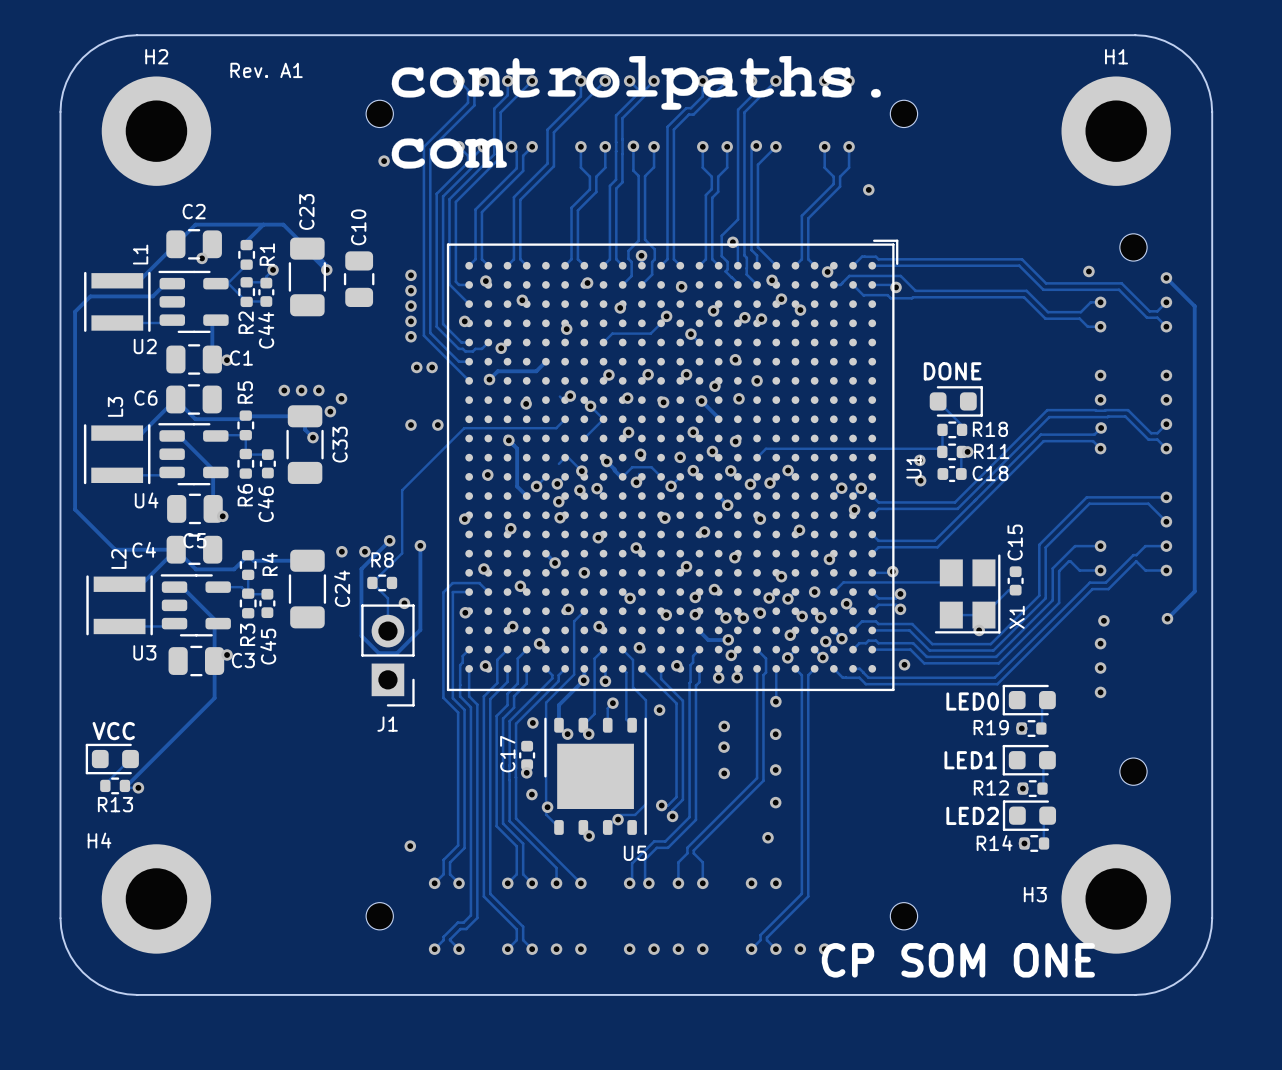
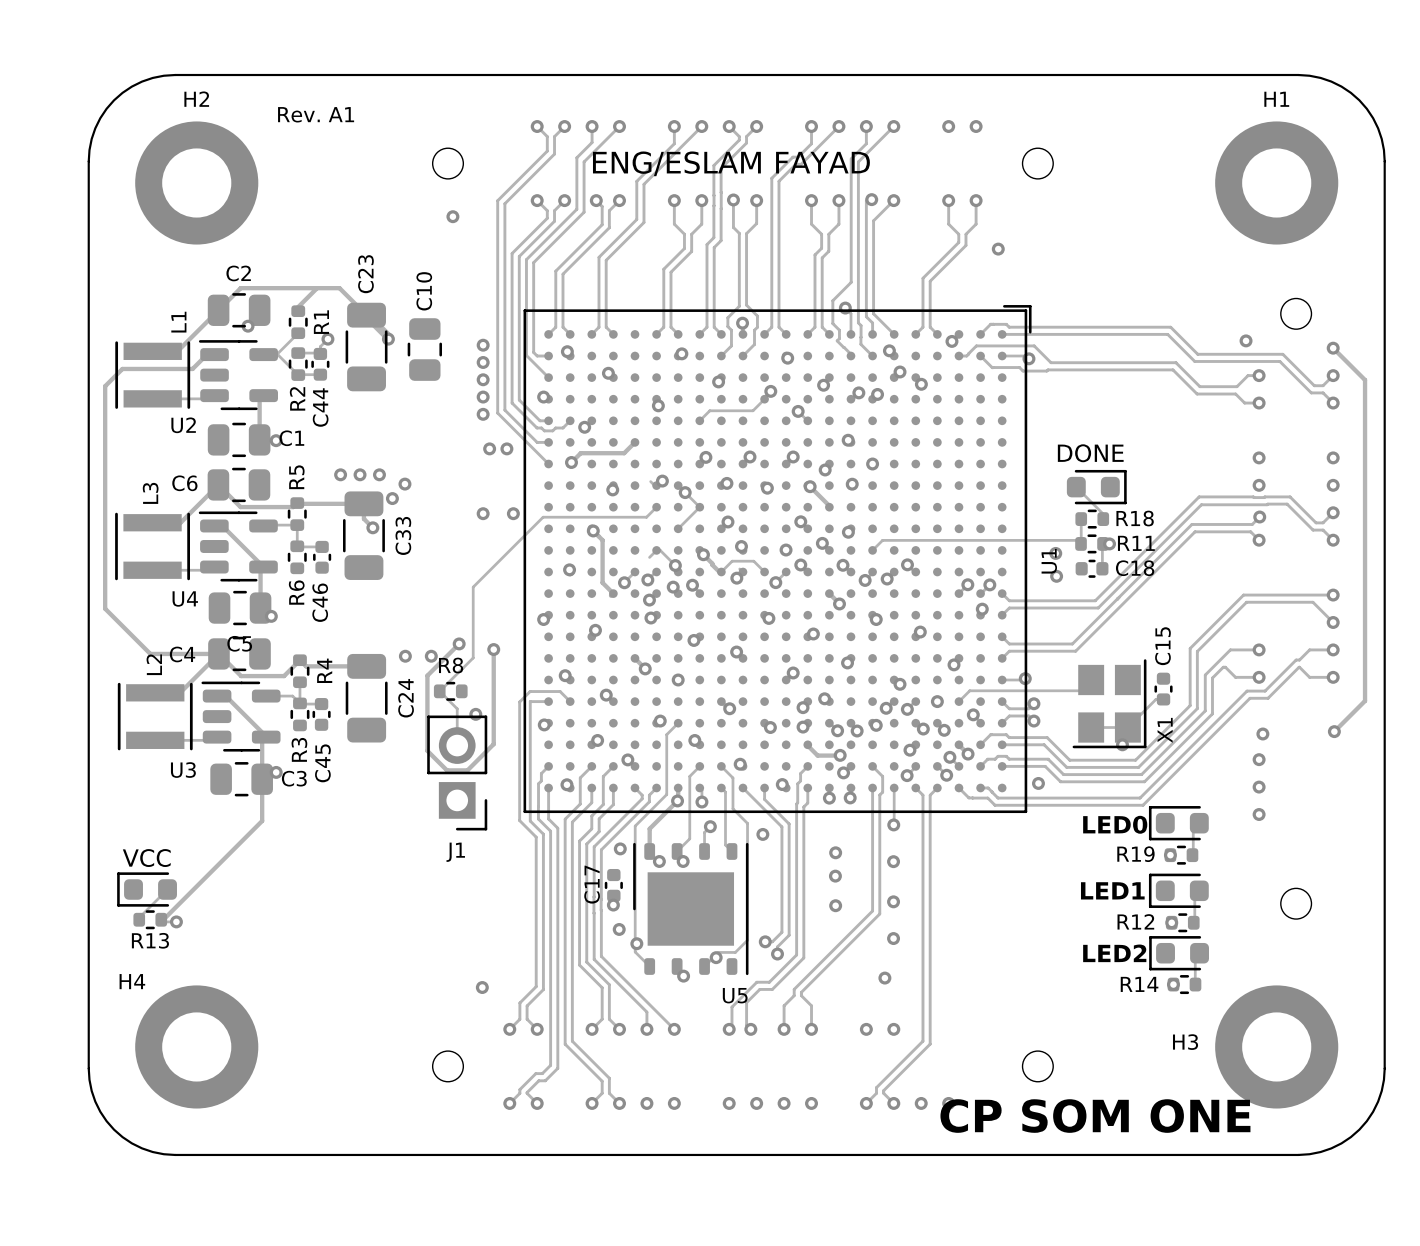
drawing: [391, 56, 881, 169] -> none
text: none -> ENG/ESLAM FAYAD (731, 163)

